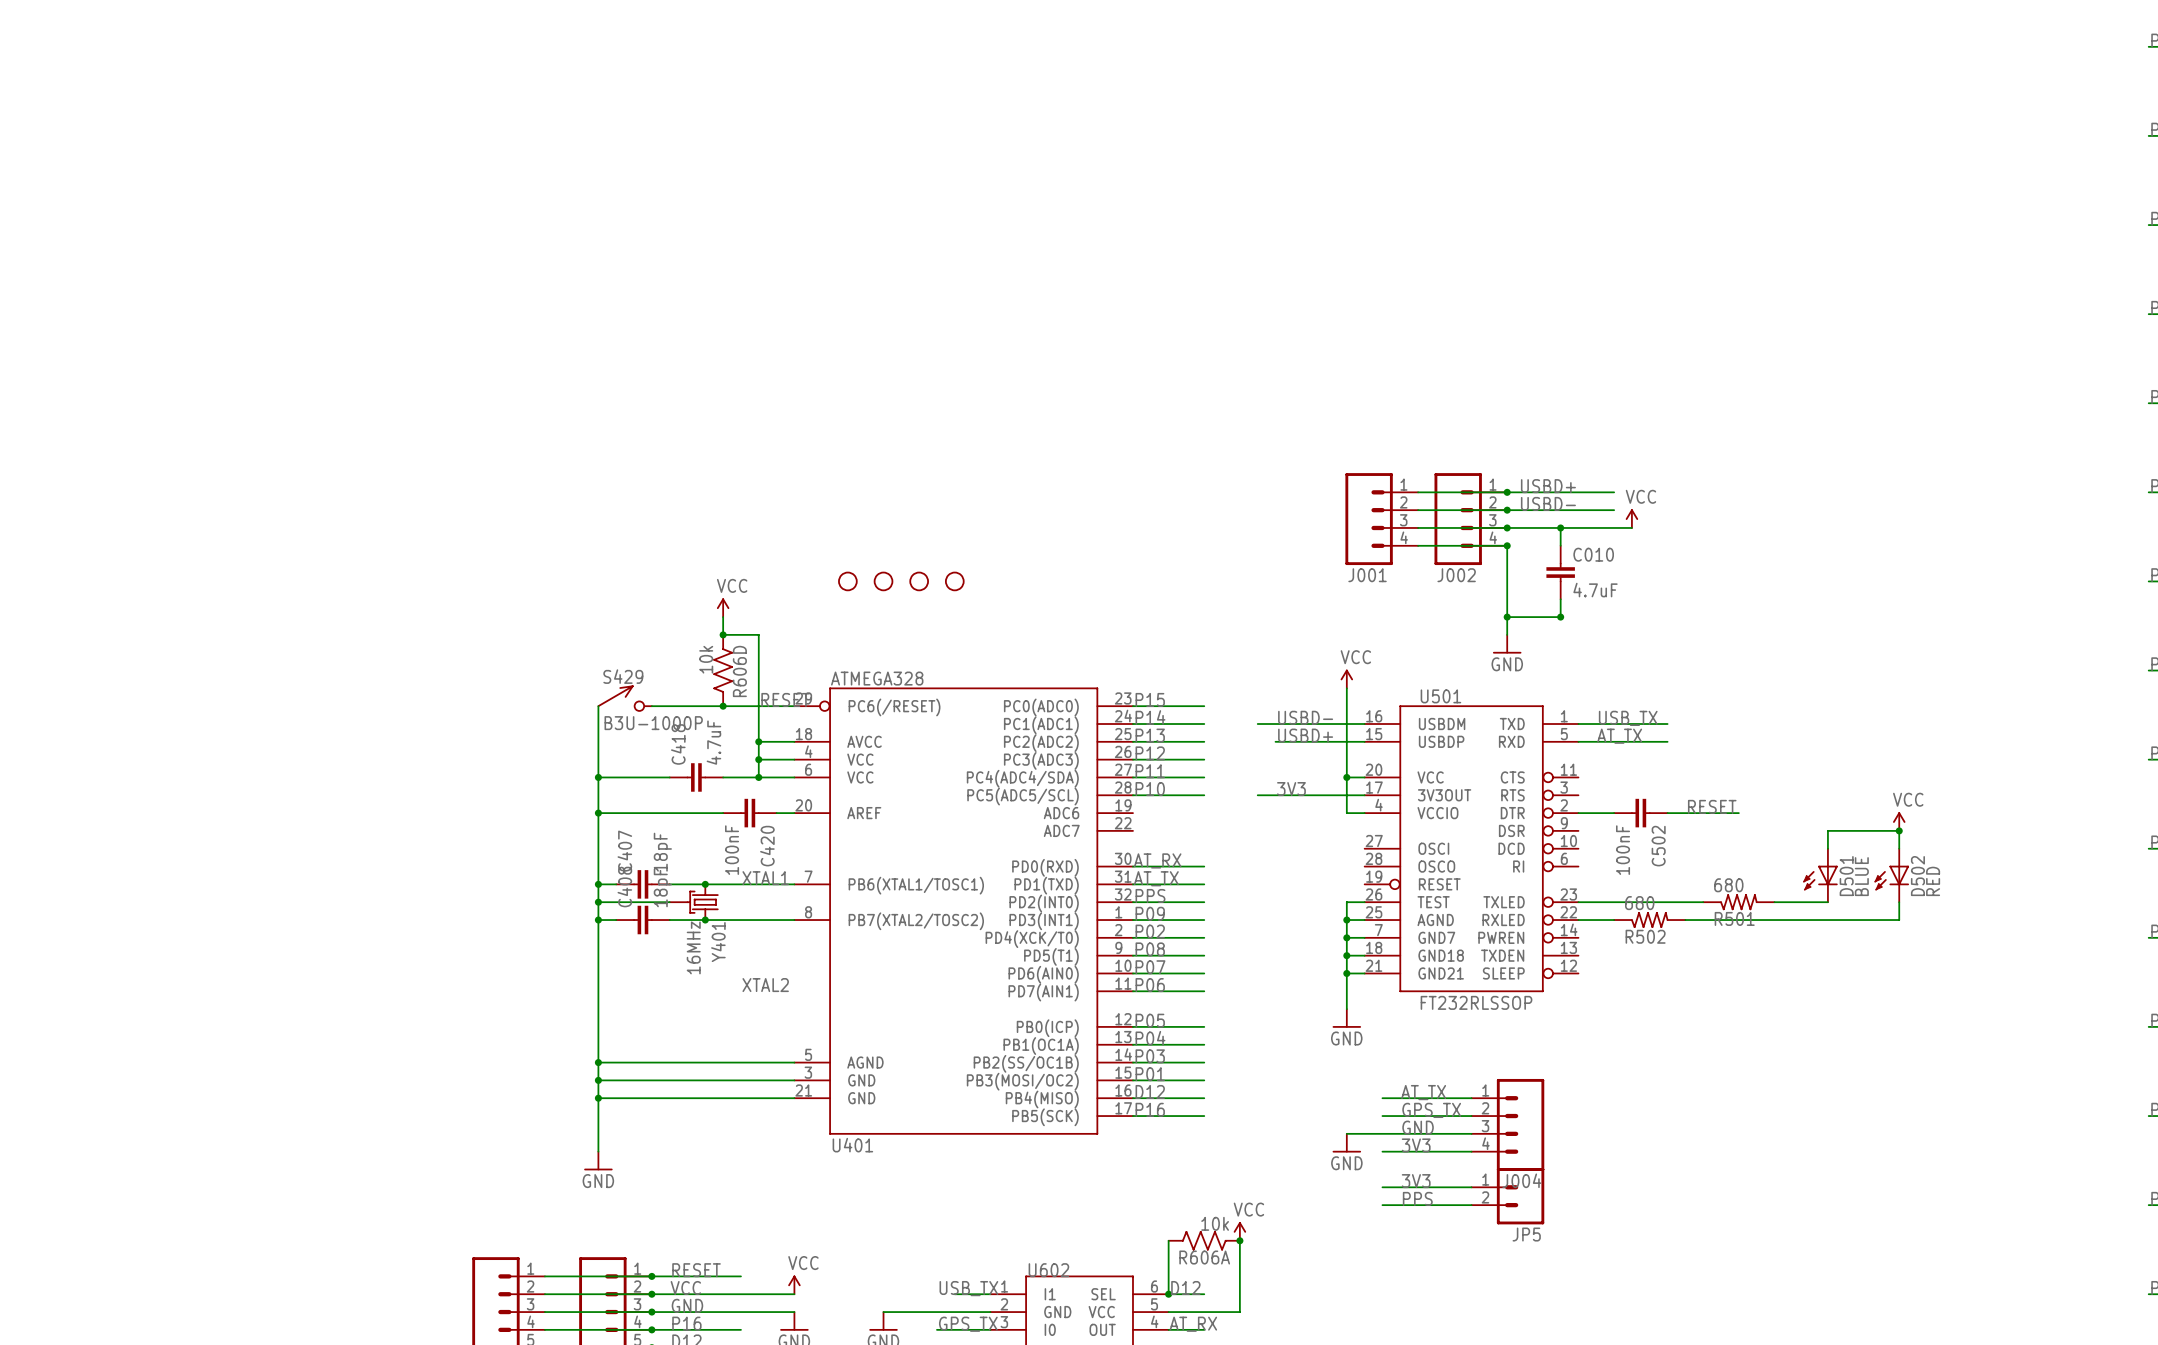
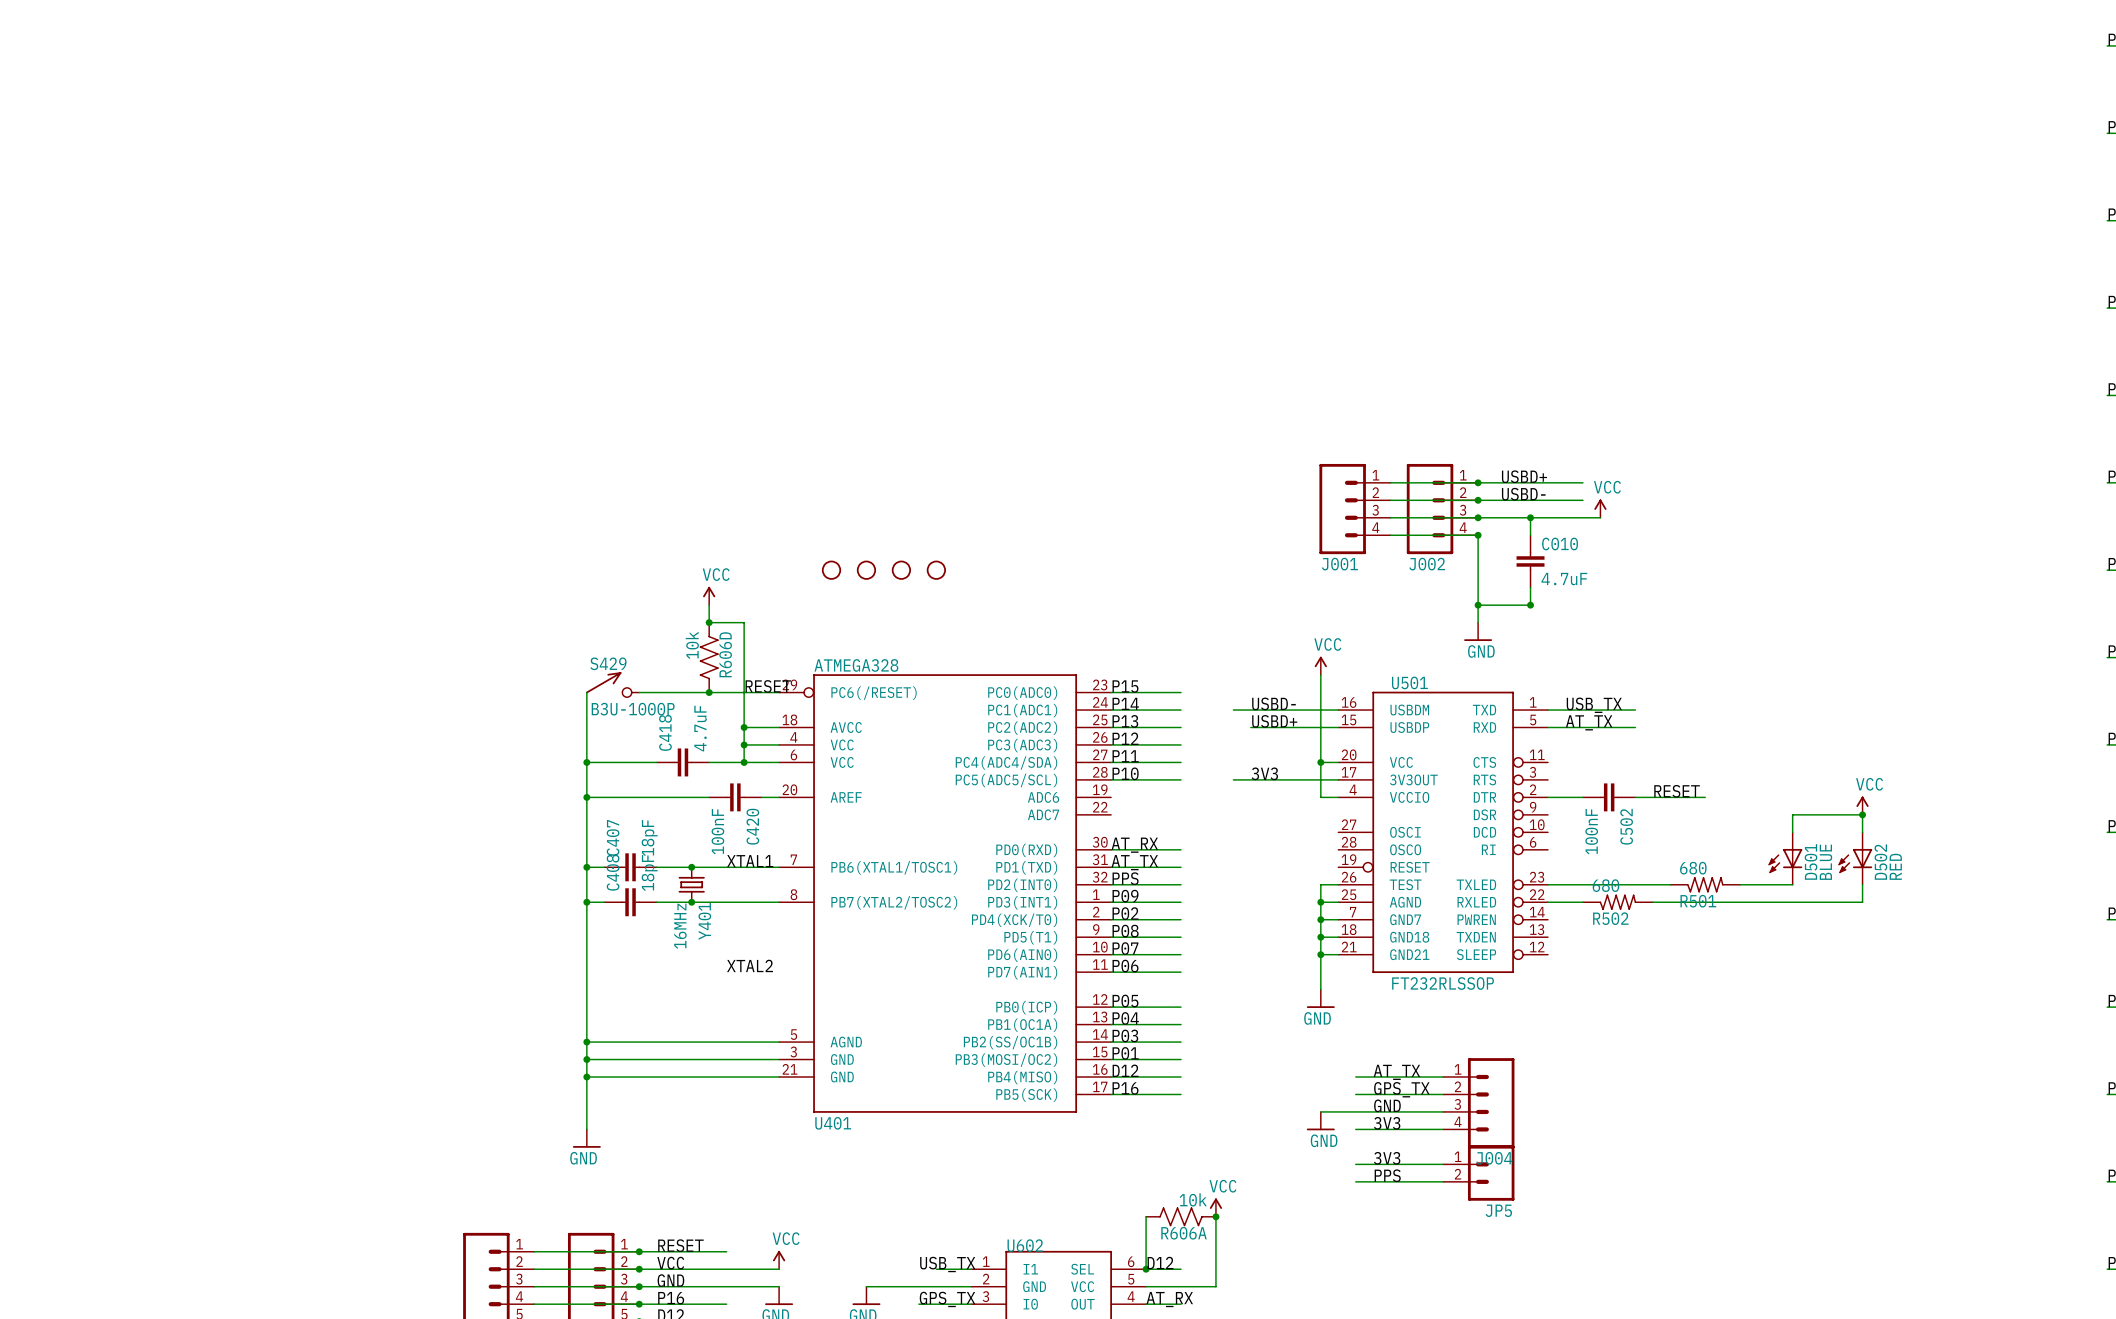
Y401 symbol: [669, 883, 719, 921] -> [678, 866, 705, 903]
wire: (598, 902) (669, 902) -> none
junction: (598, 902) -> none

